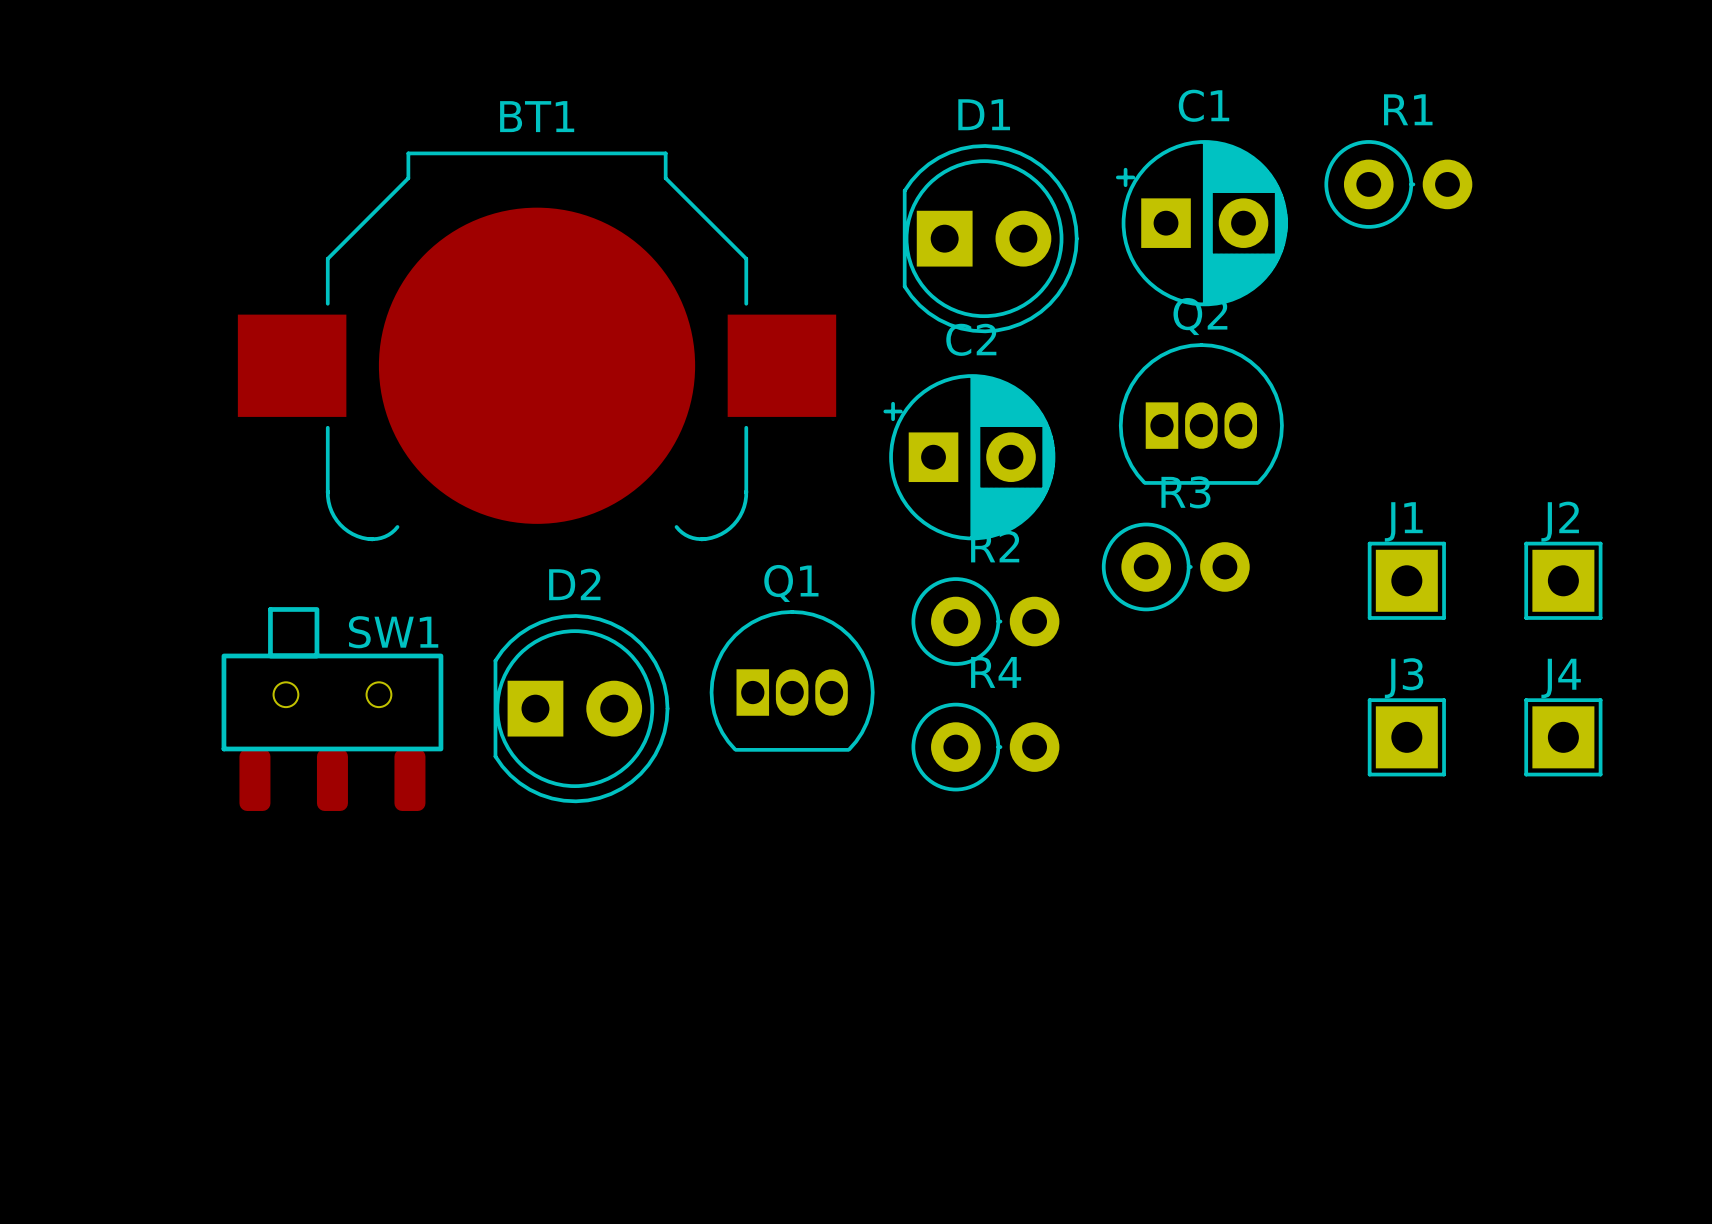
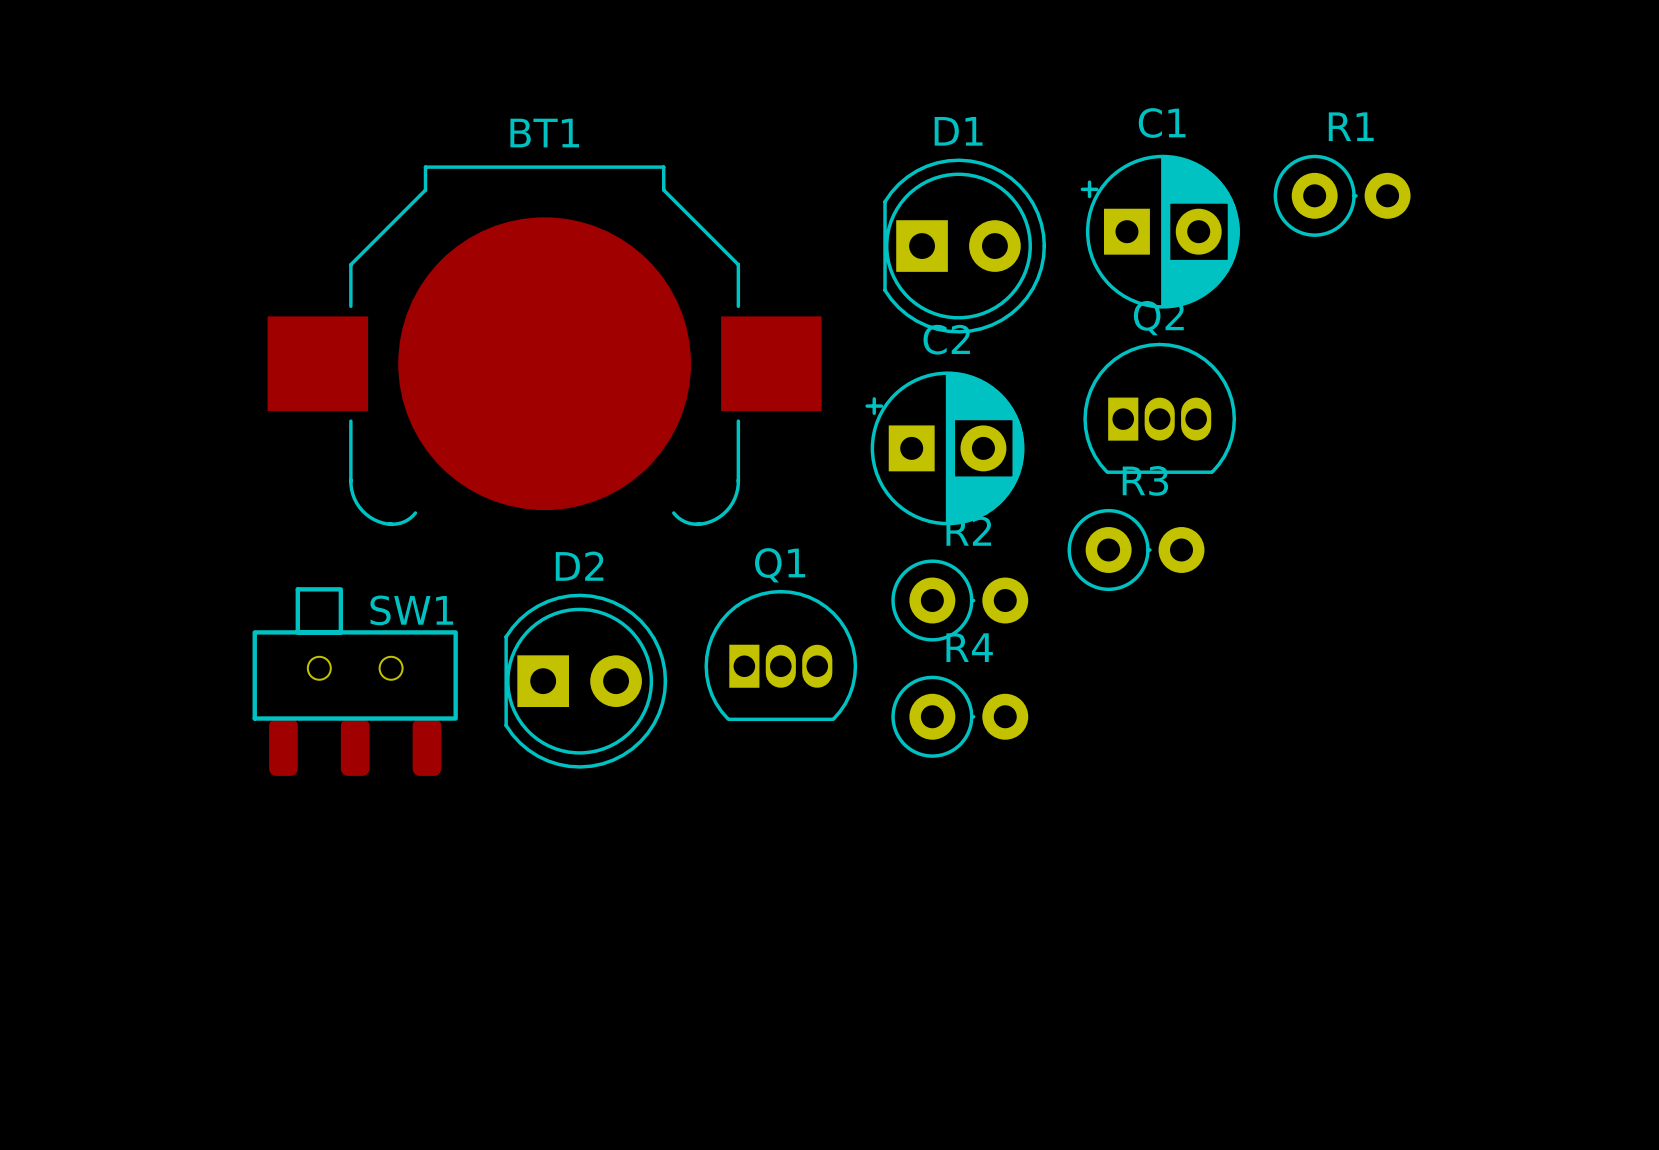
J1: (1406, 580) -> none
J2: (1563, 580) -> none
SW1 footprint: [221, 607, 444, 811] -> [252, 587, 458, 776]
J3: (1406, 737) -> none
J4: (1563, 737) -> none

